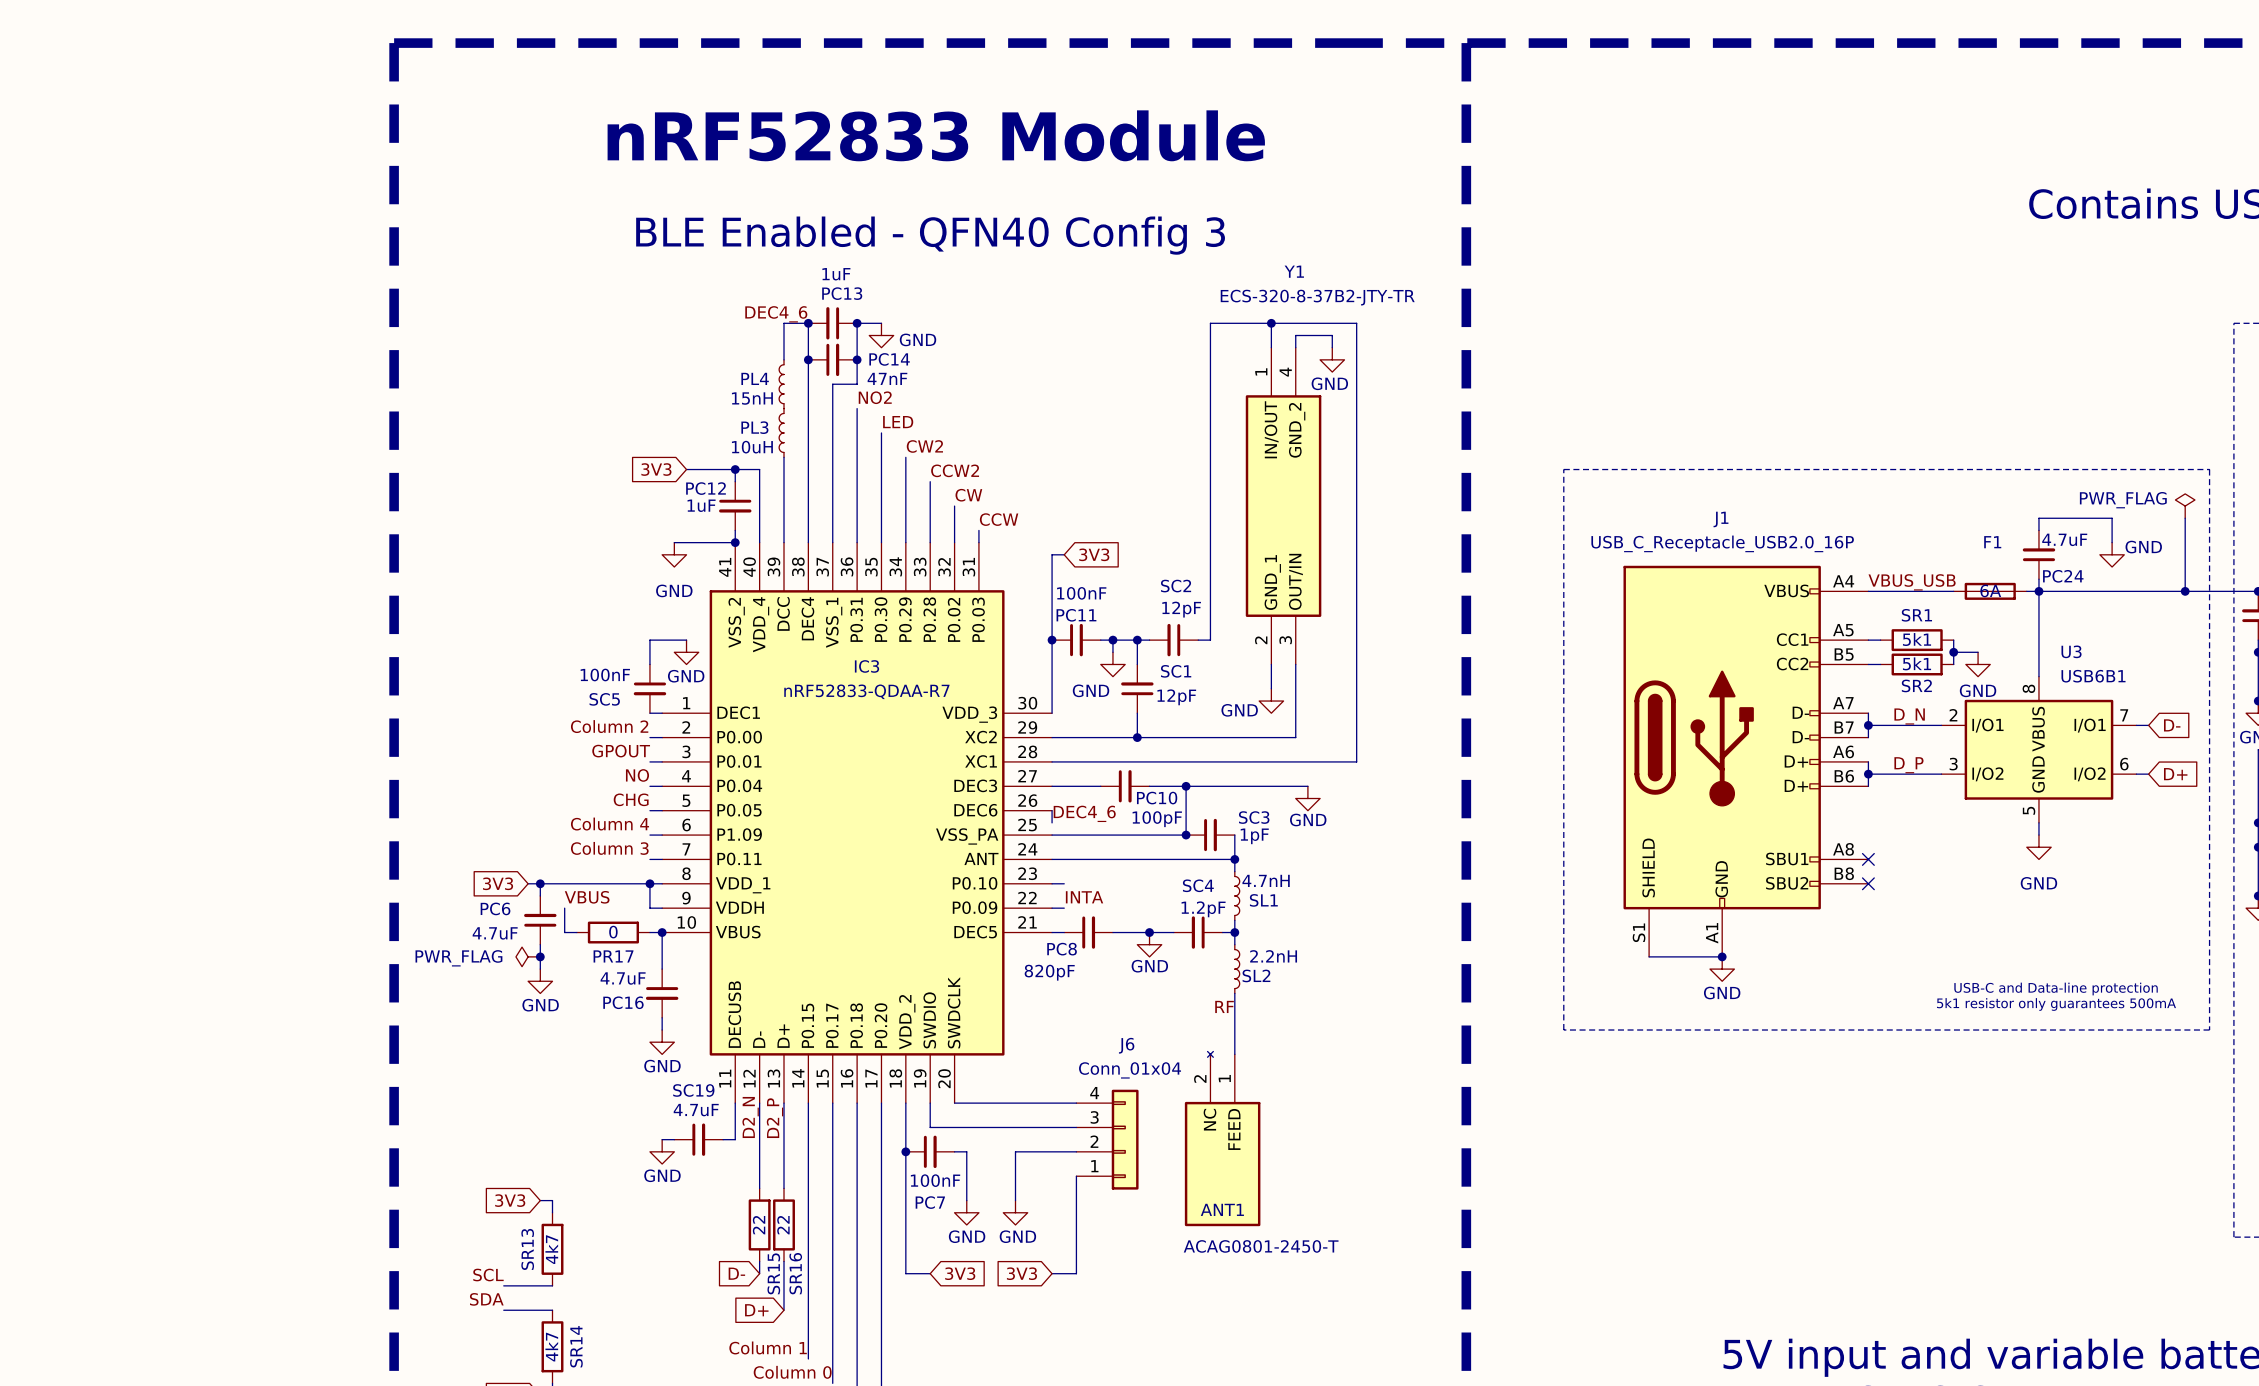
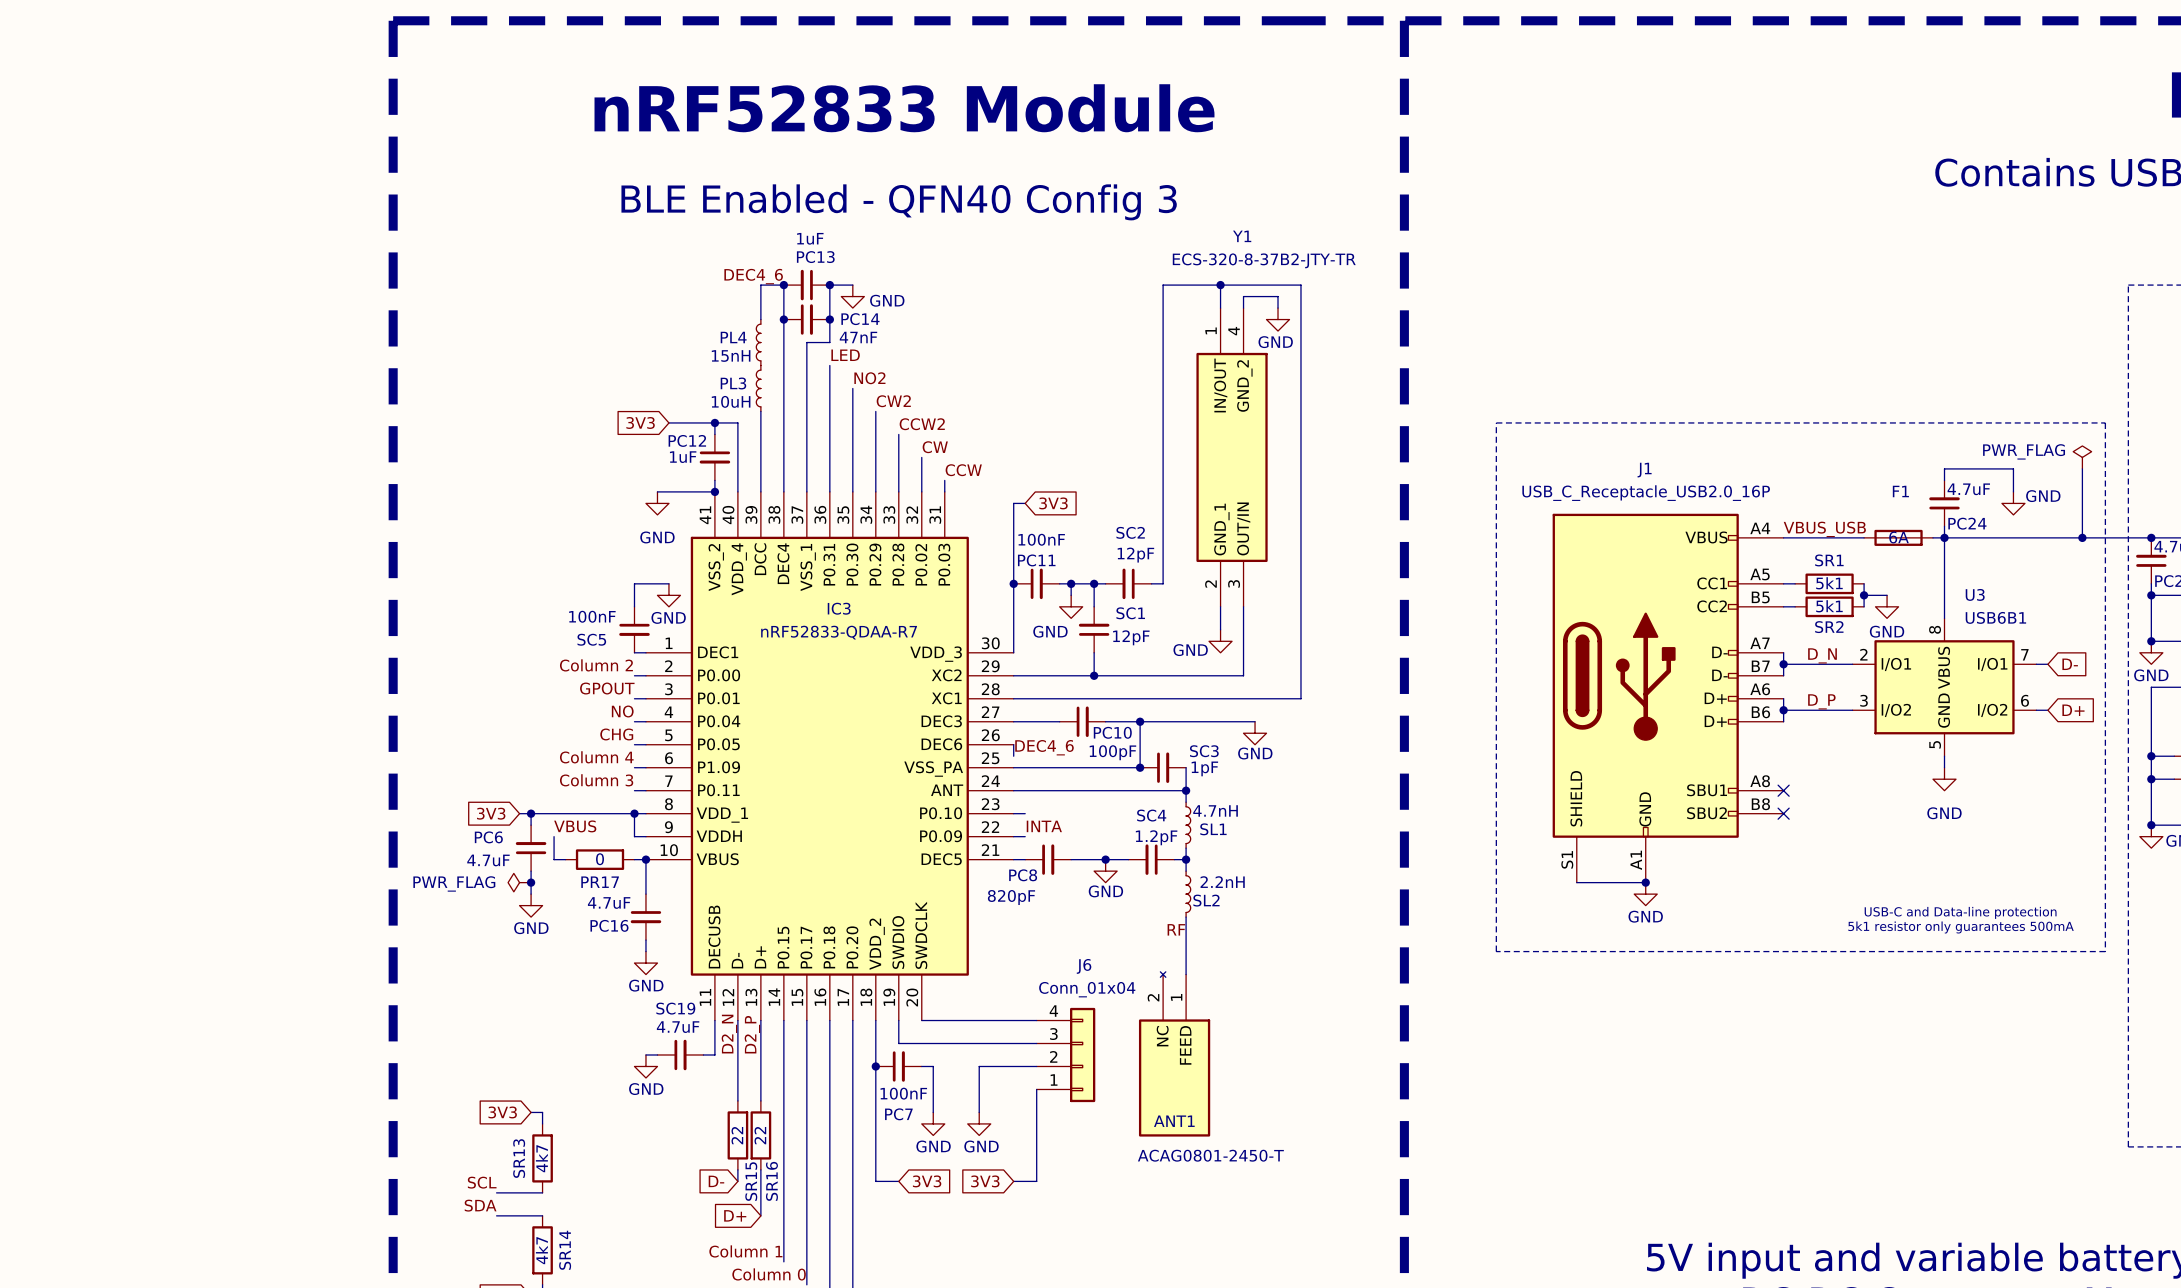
label: NO2 (875, 397) -> LED (845, 355)
label: LED (898, 422) -> NO2 (869, 378)

